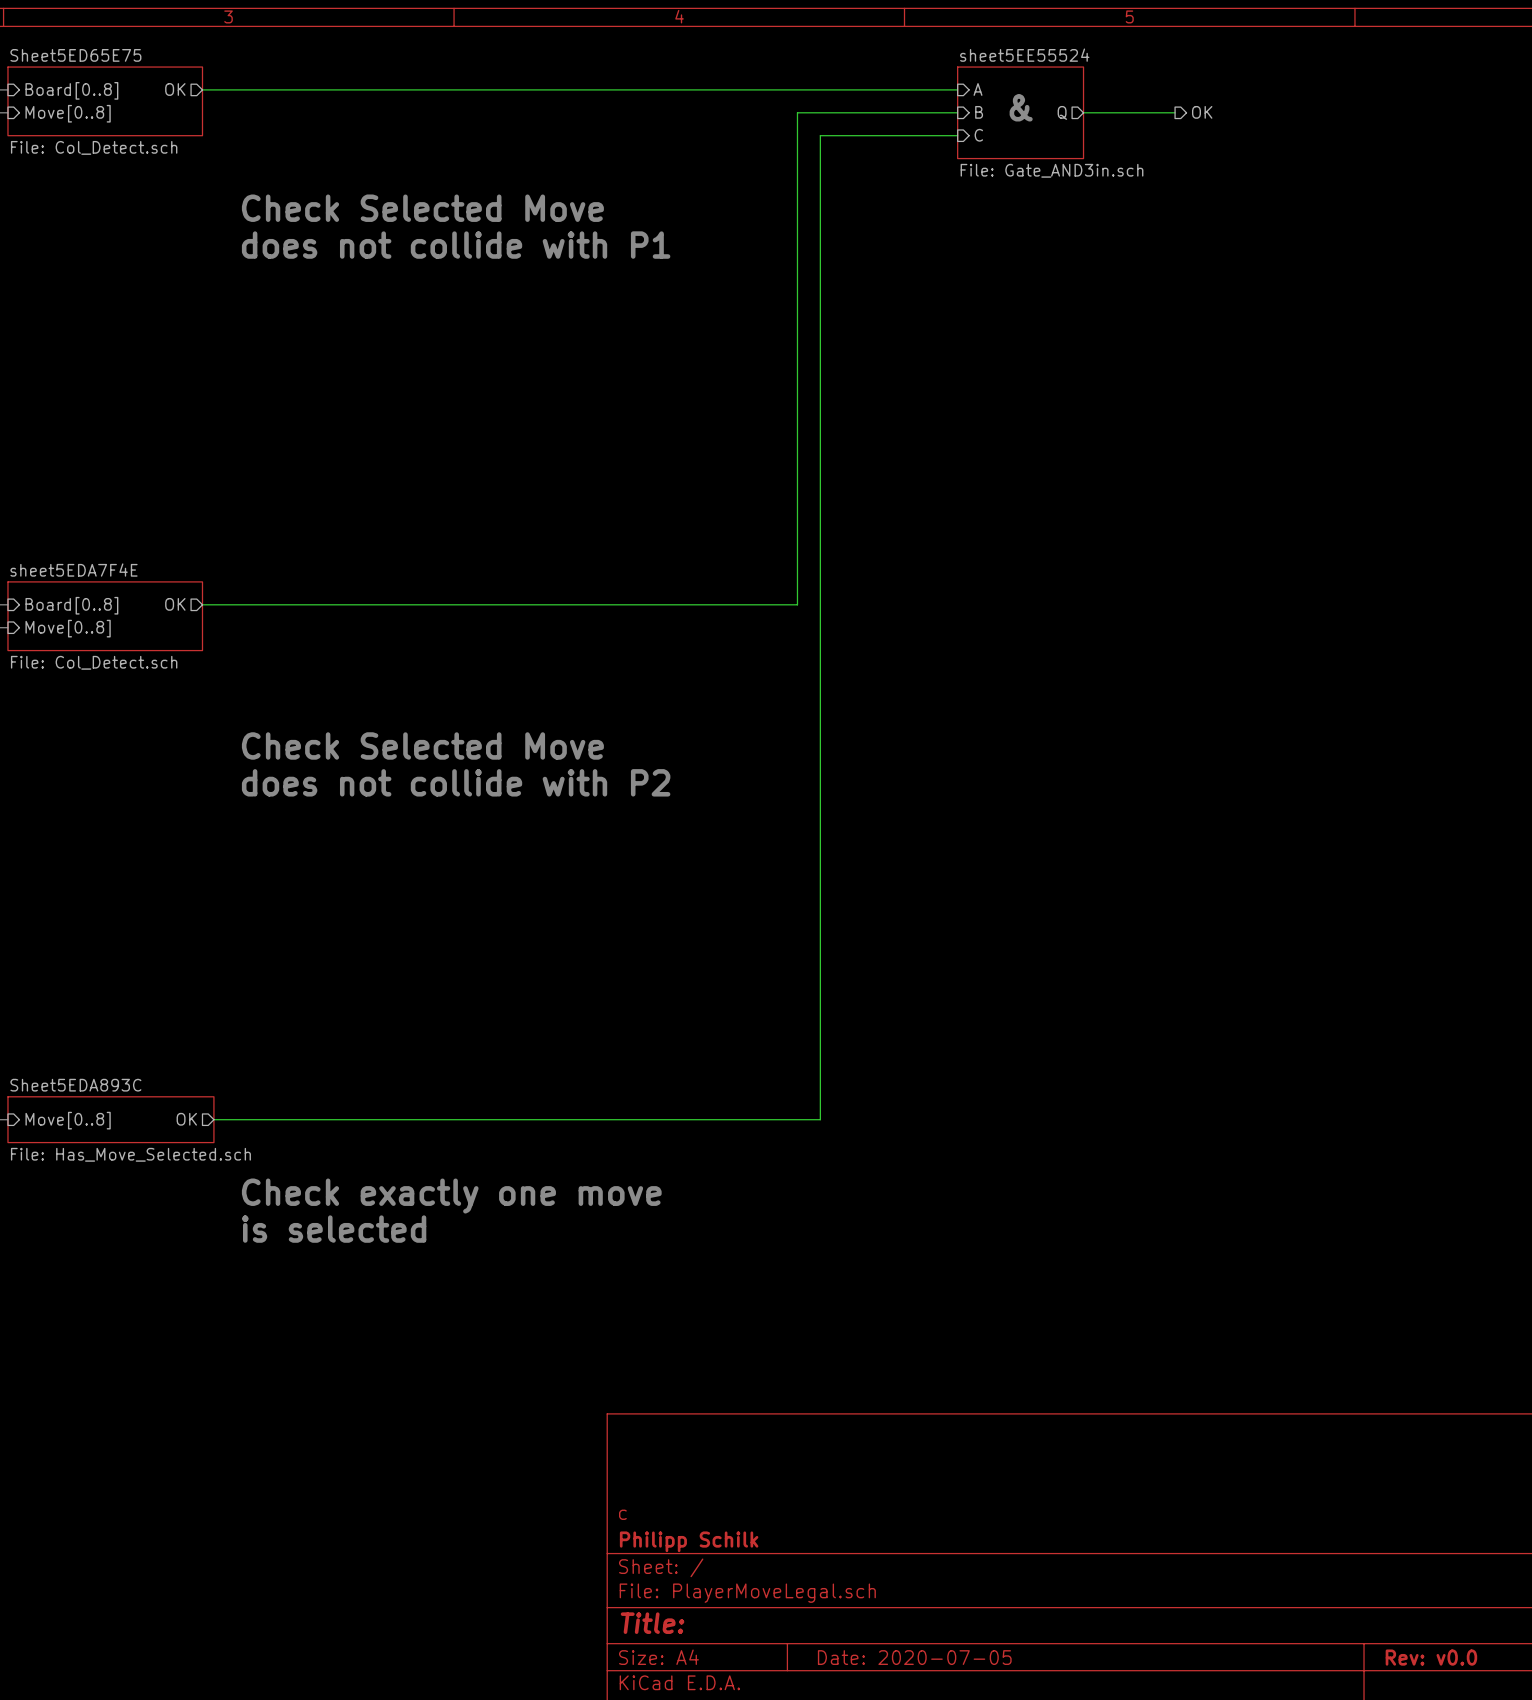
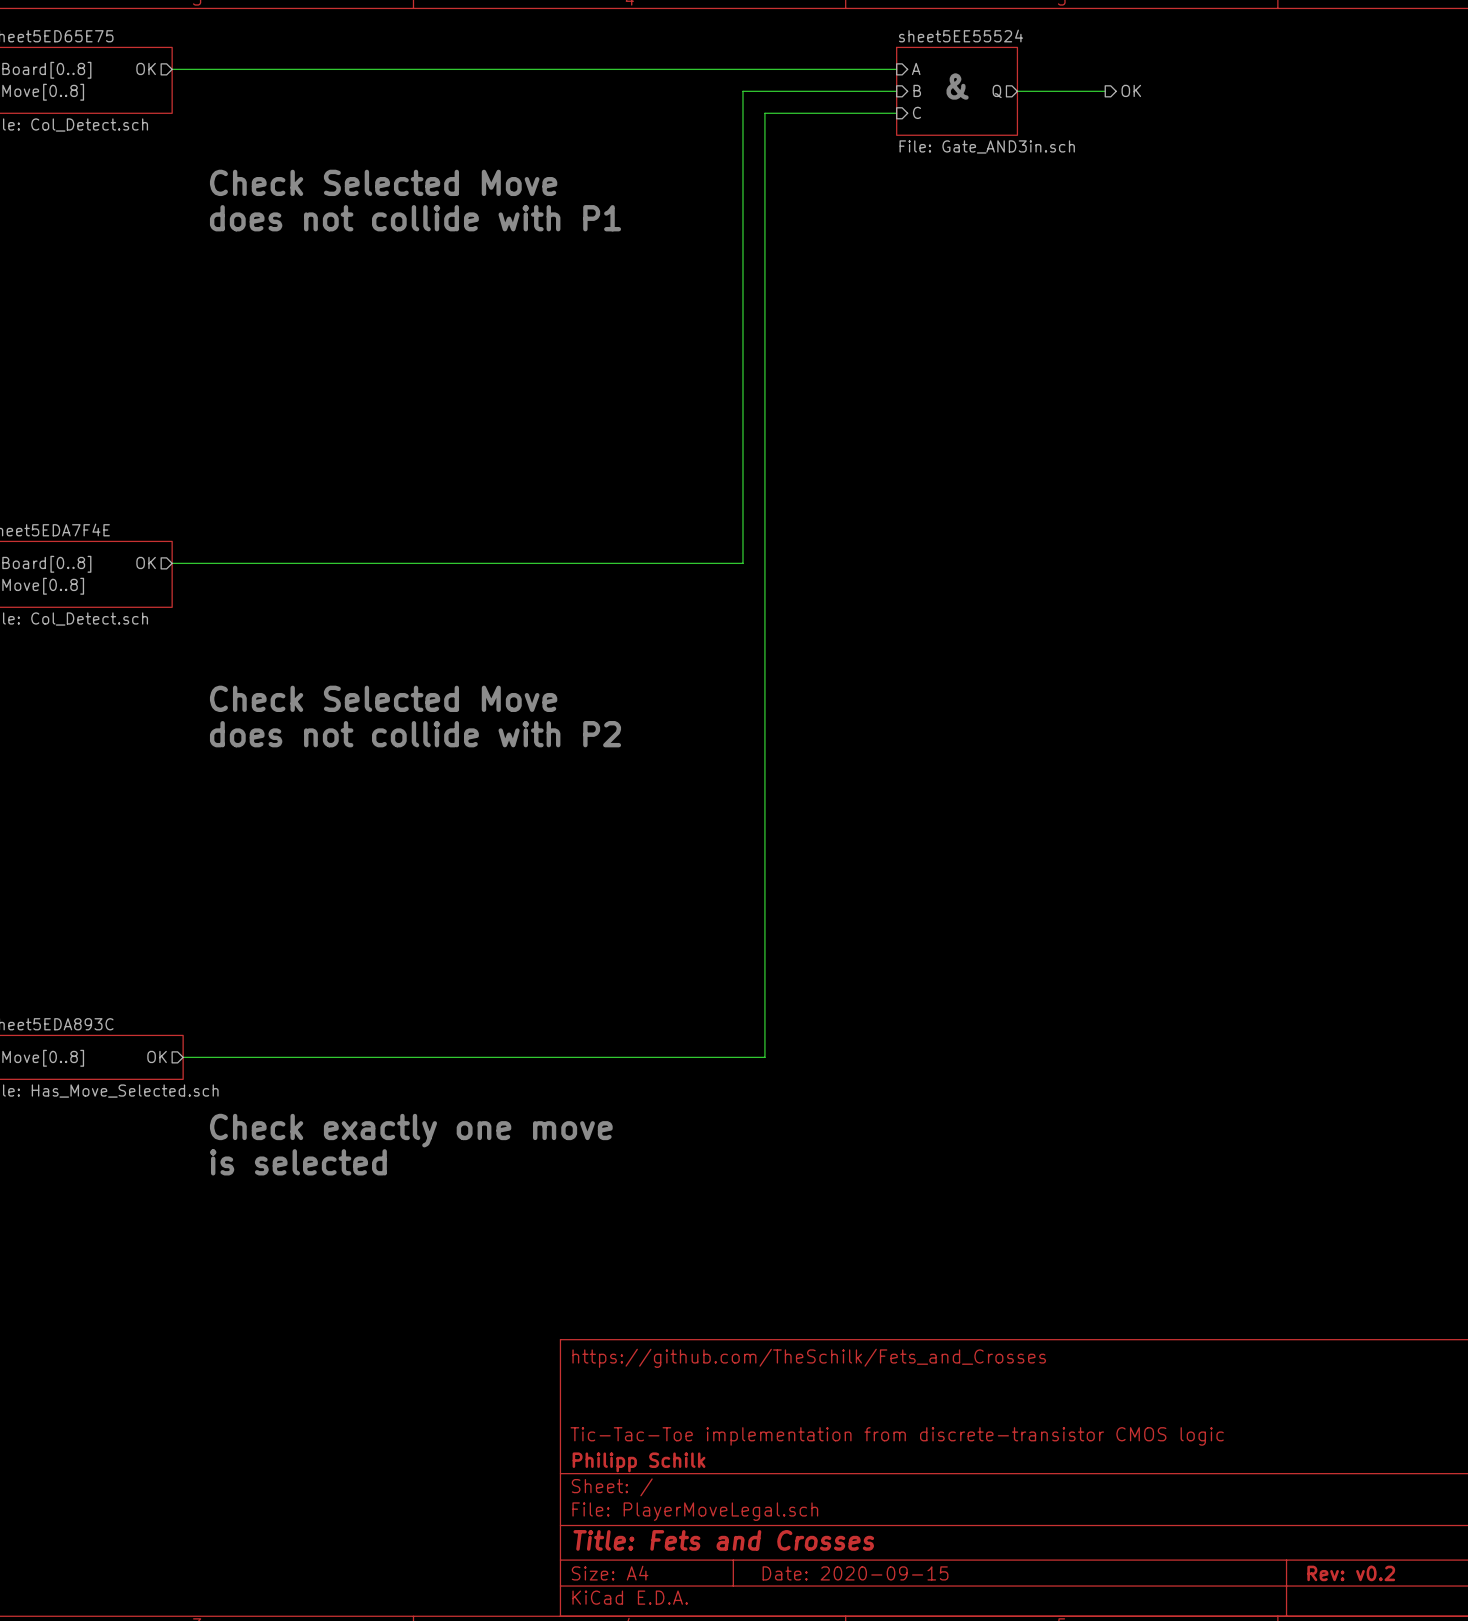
title block: none -> https://github.com/TheSchilk/Fets_and_Crosses (809, 1358)
title block: c (622, 1514) -> Tic-Tac-Toe implementation from discrete-transistor CMOS logic (897, 1436)
title block: Title: (652, 1623) -> Title: Fets and Crosses (723, 1540)
title block: Date: 2020-07-05 (914, 1657) -> Date: 2020-09-15 (855, 1573)
title block: Rev: v0.0 (1431, 1657) -> Rev: v0.2 (1351, 1573)

